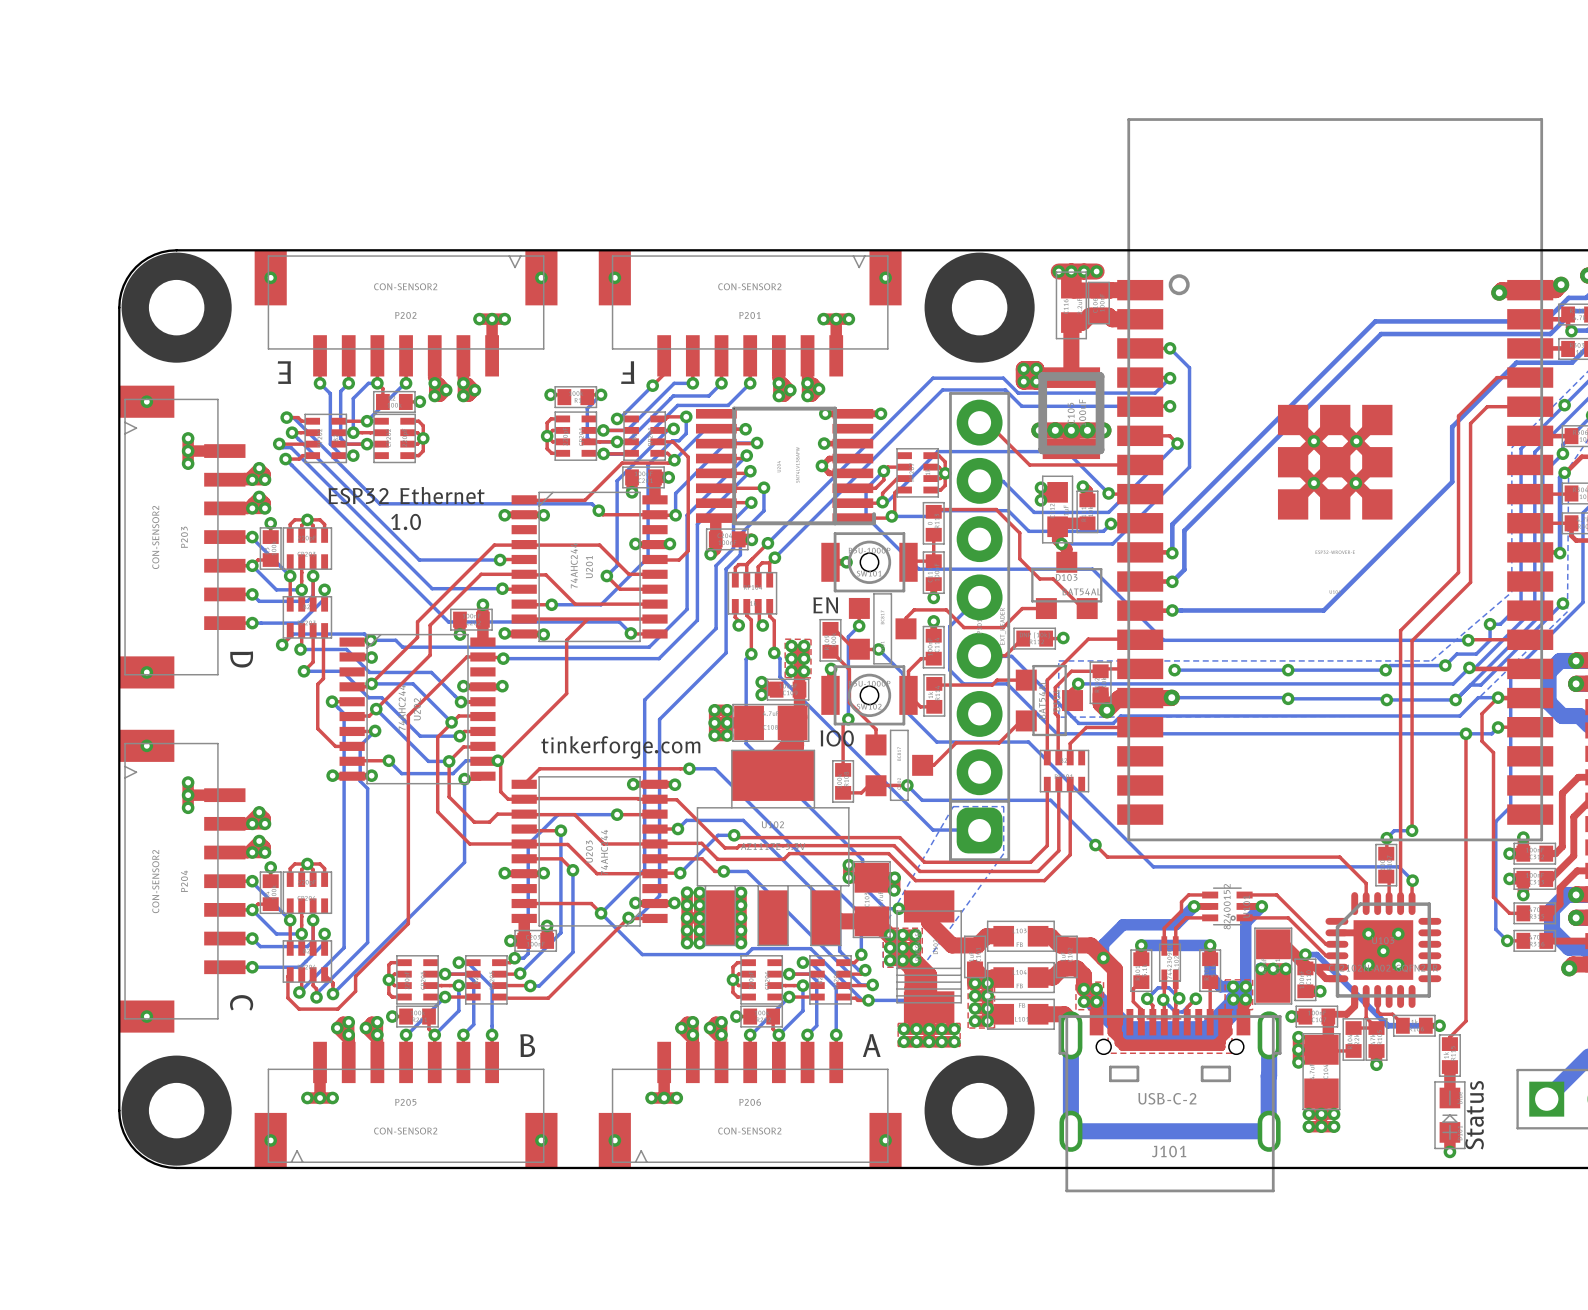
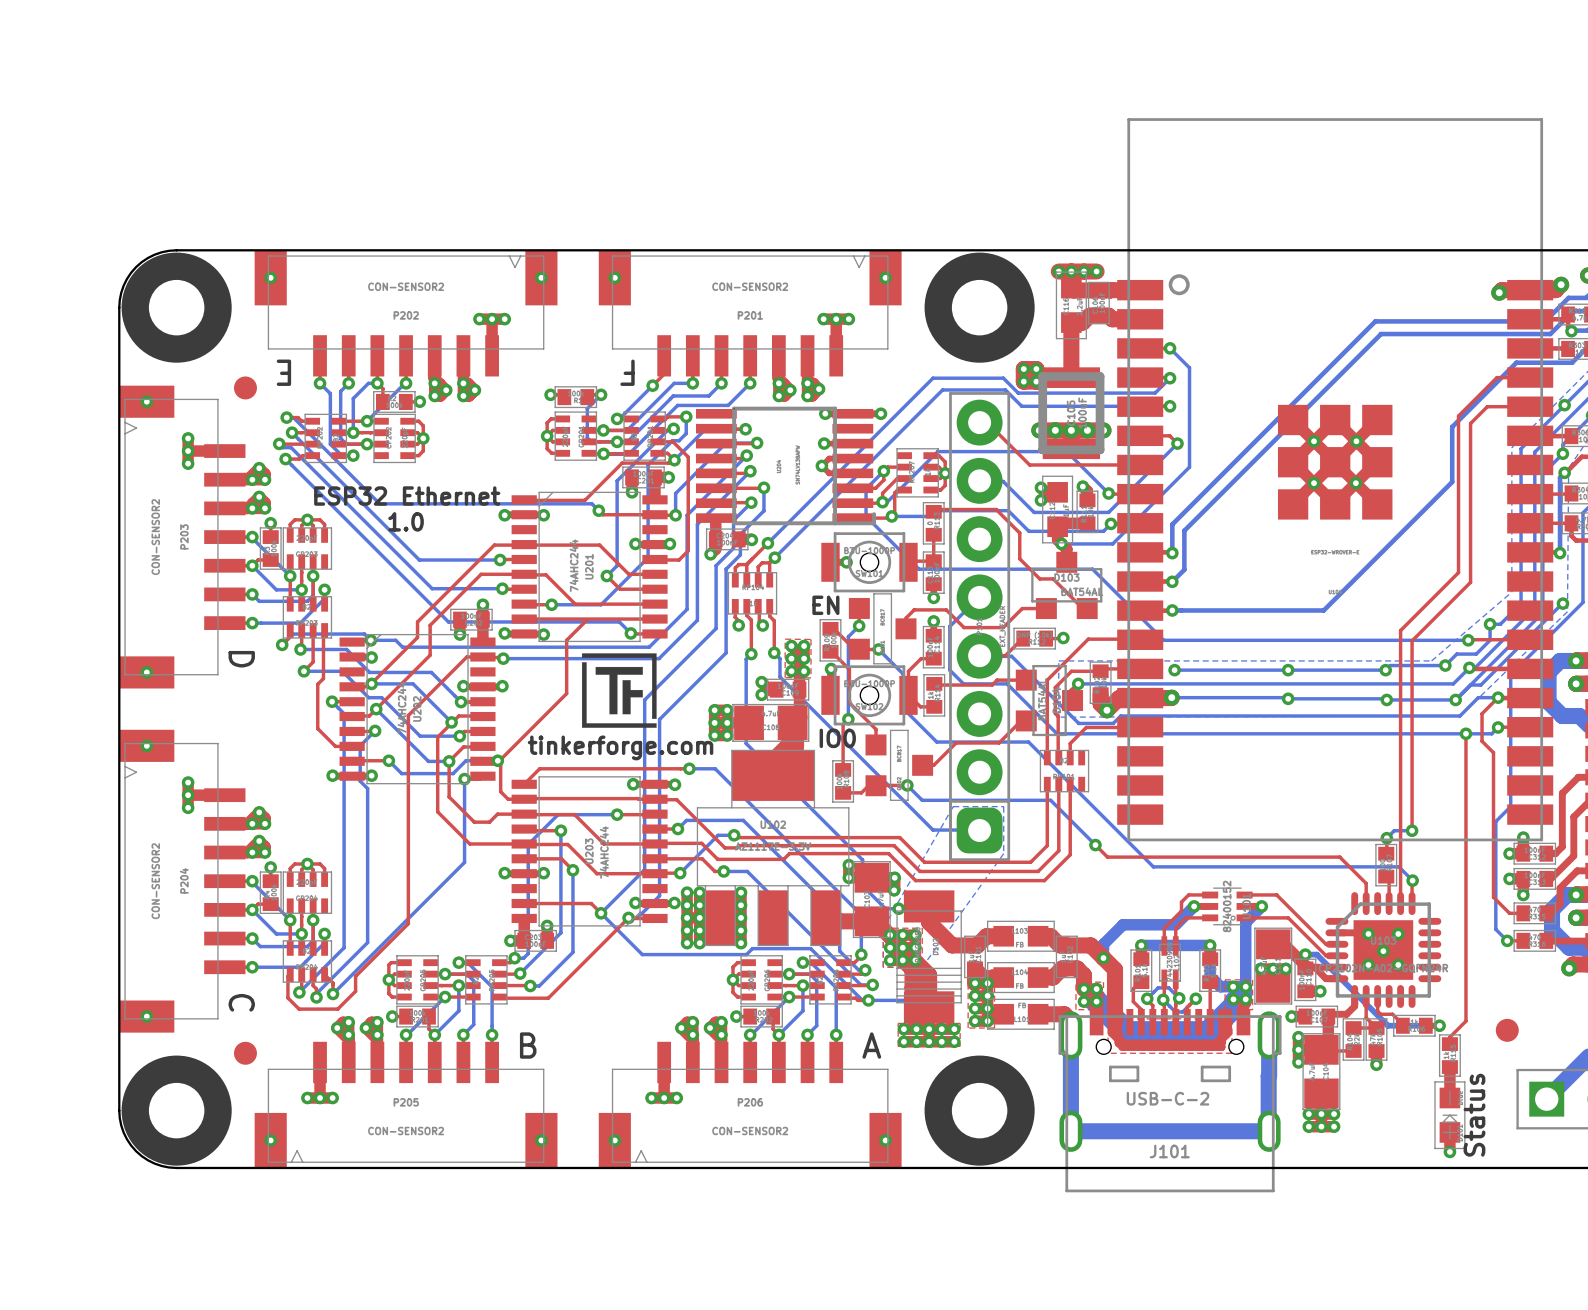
part: none -> (245, 387)
drawing: none -> [581, 653, 657, 728]
part: none -> (1507, 1030)
part: none -> (245, 1053)

